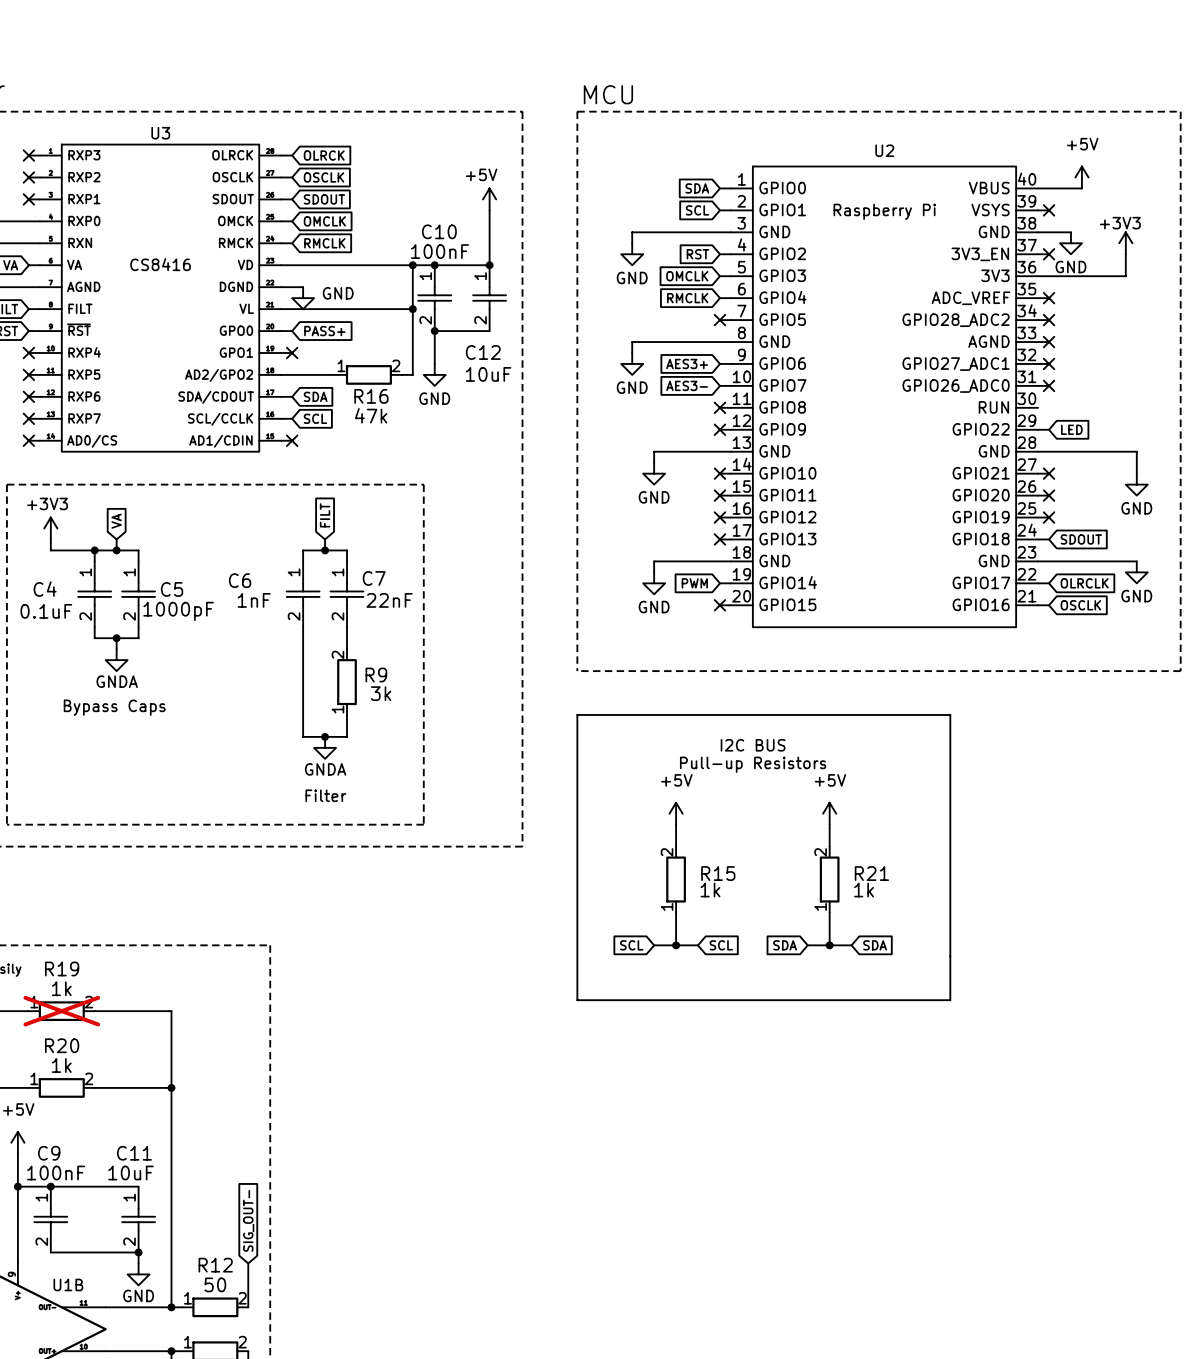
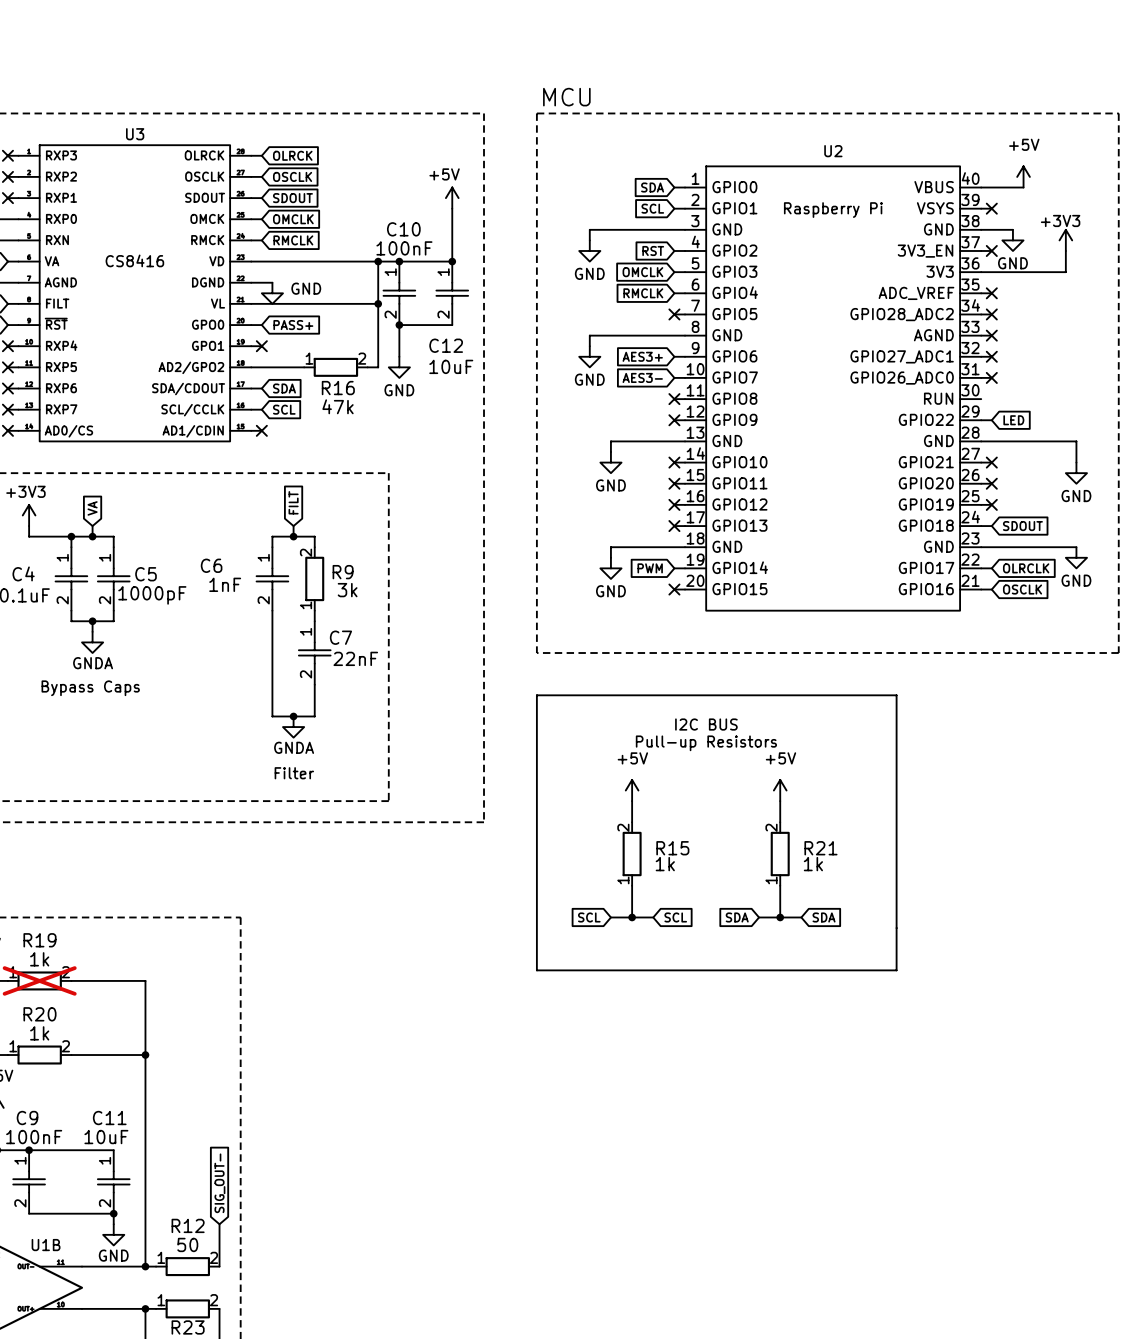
C7 position: (347, 594) -> (314, 653)
R9 position: (347, 682) -> (314, 578)

